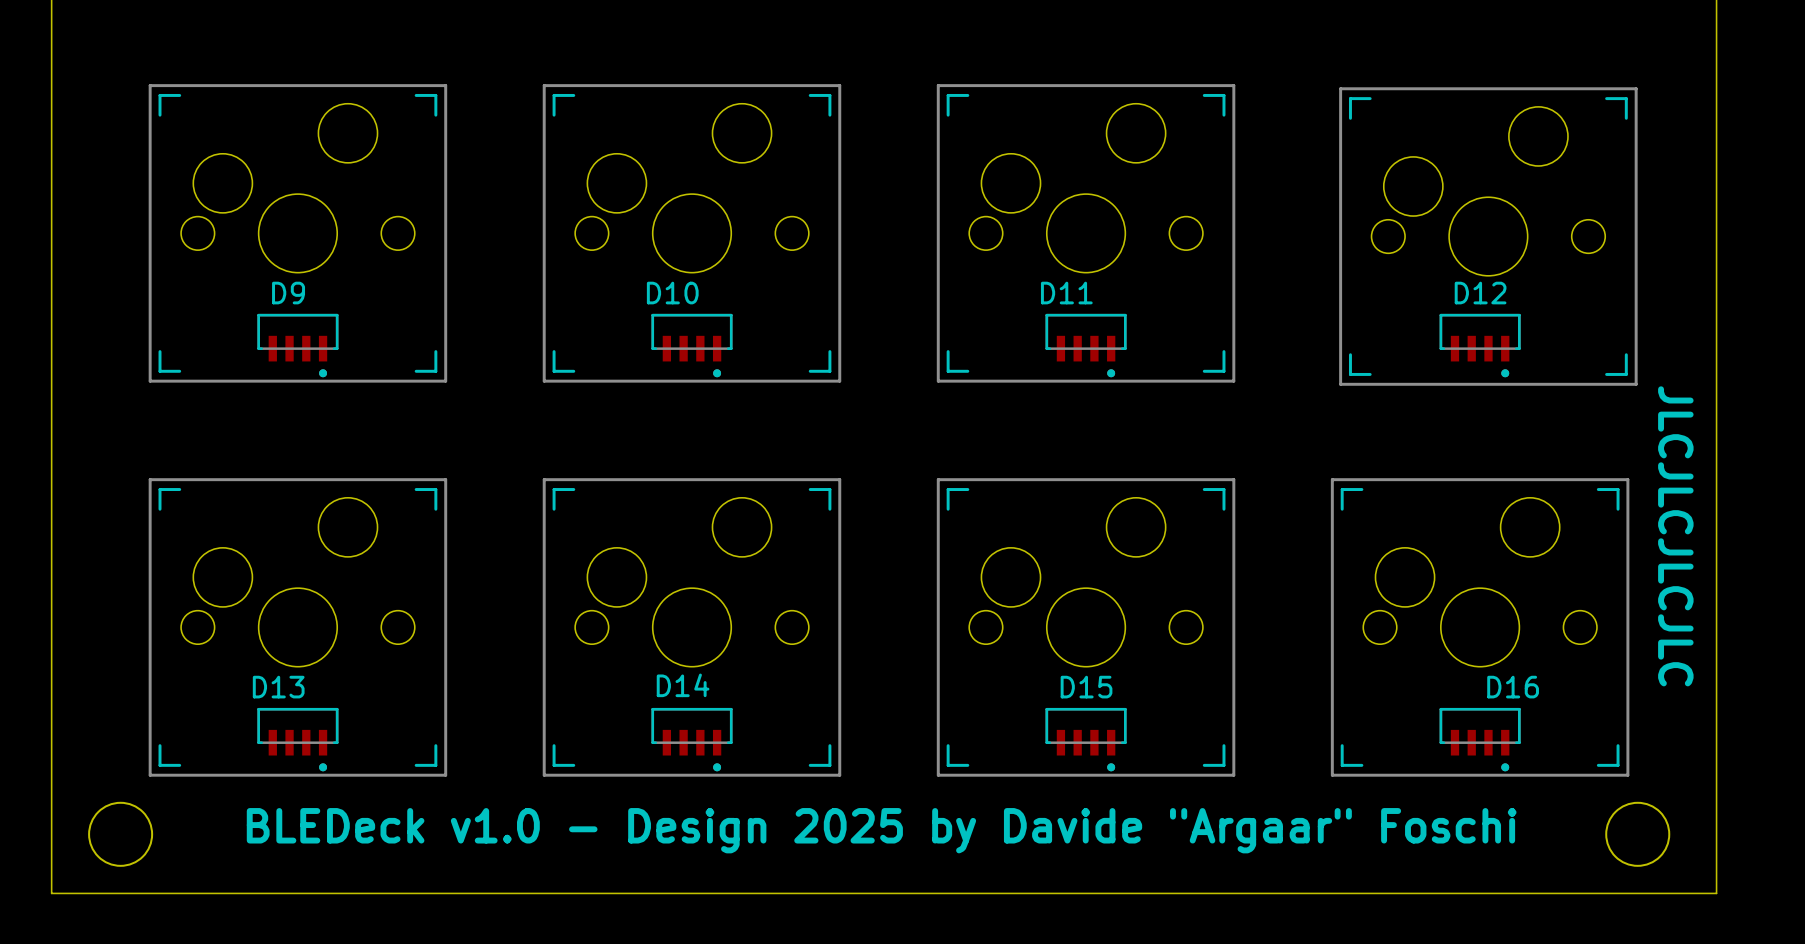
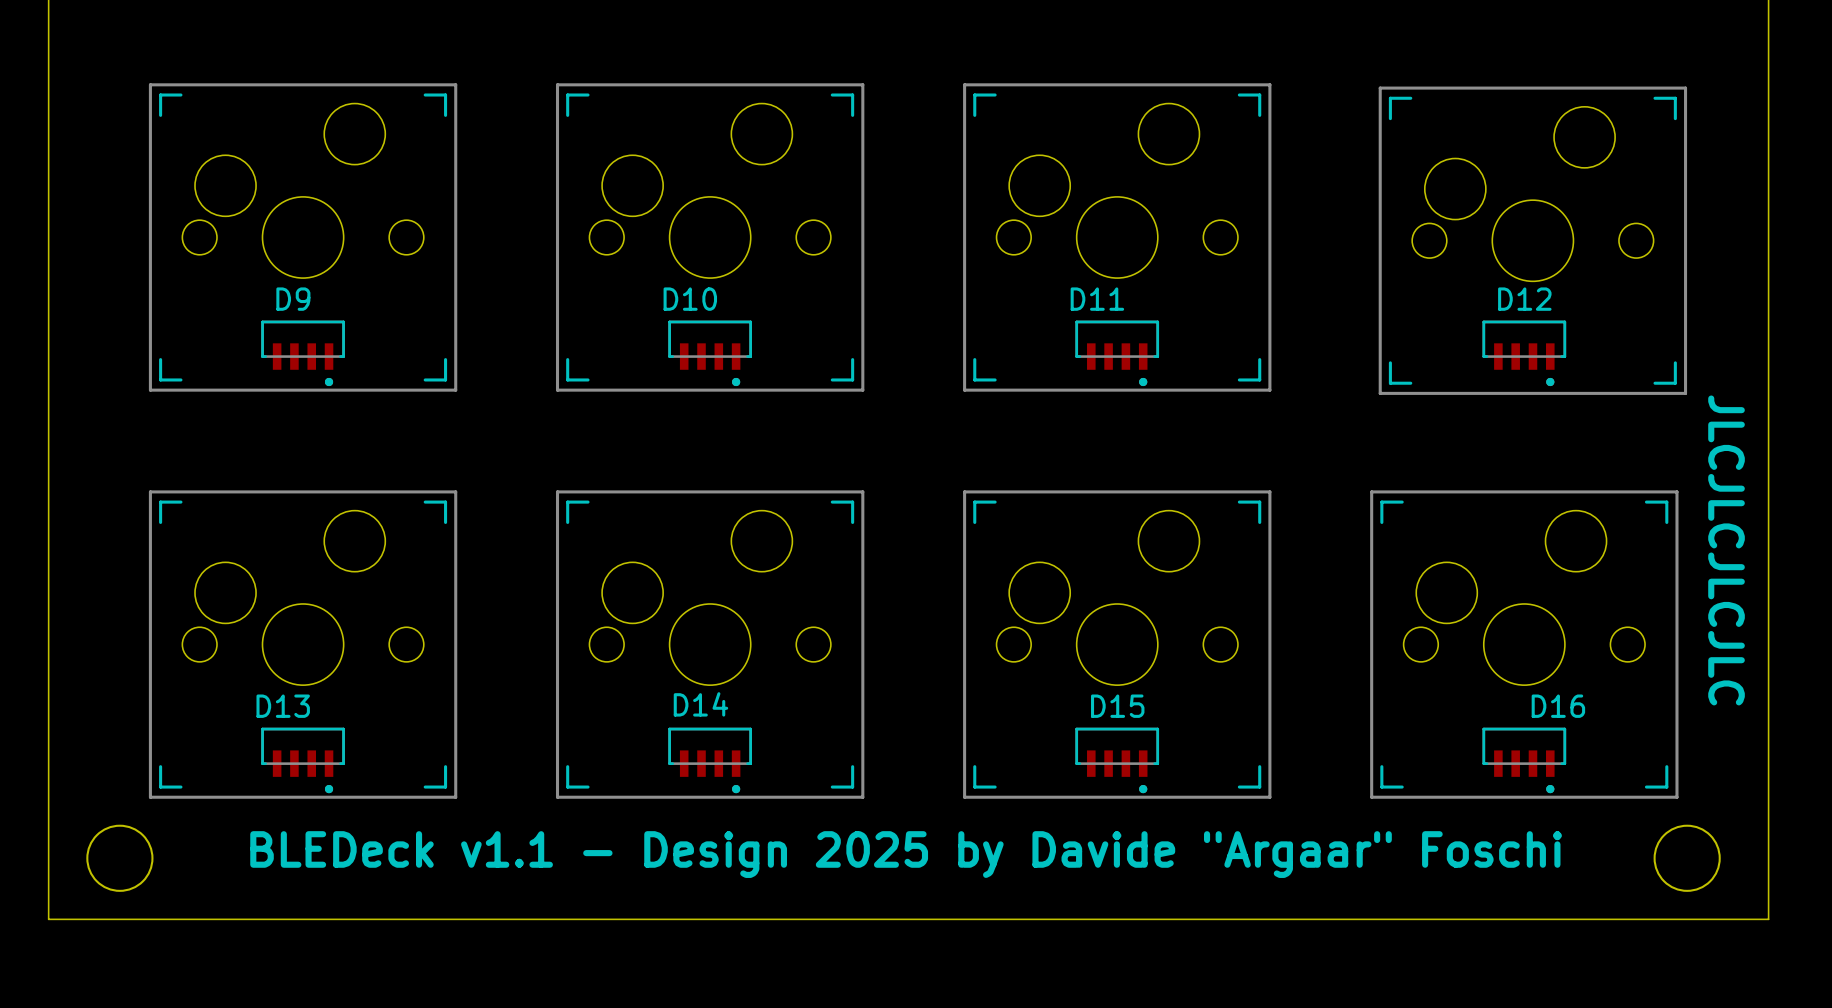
text: BLEDeck v1.0 - Design 2025 by Davide "Argaar" Foschi (881, 830) -> BLEDeck v1.1 - Design 2025 by Davide "Argaar" Foschi (906, 854)

